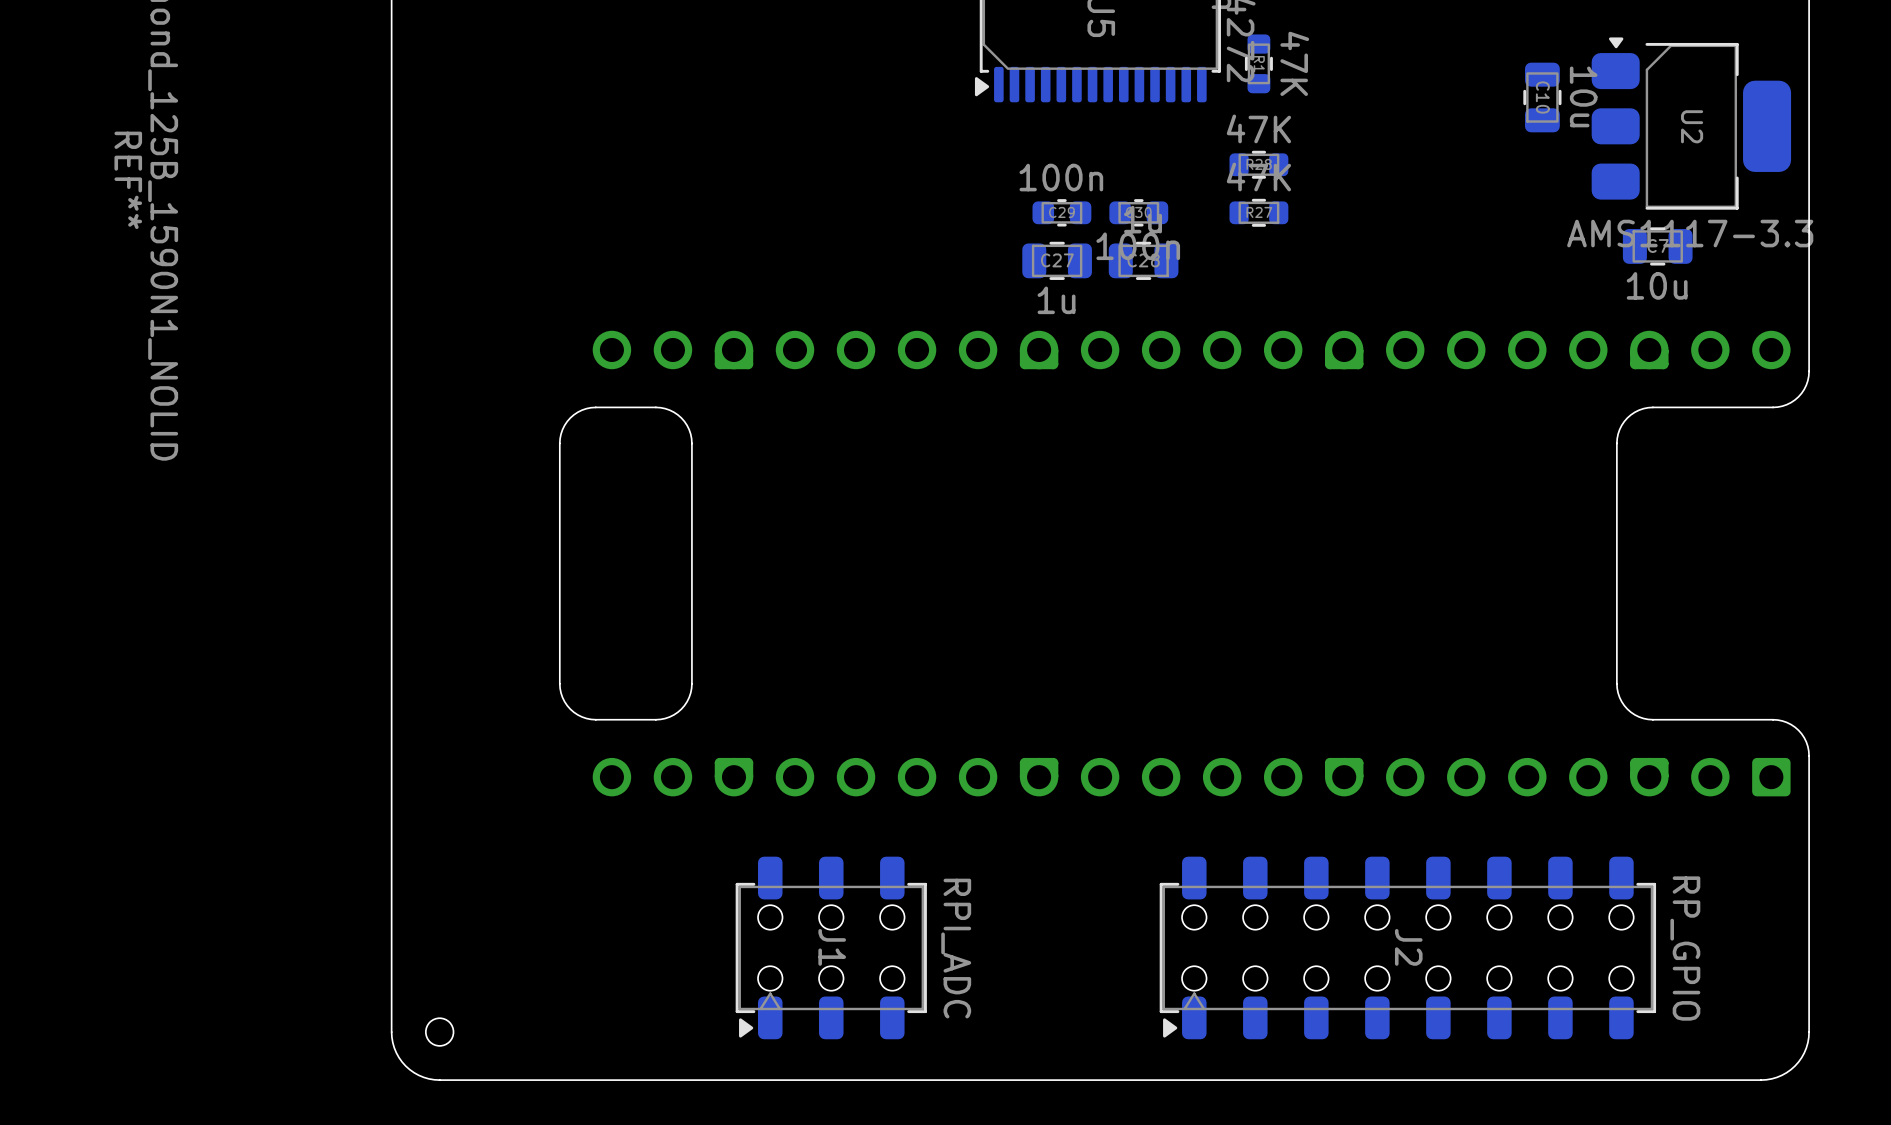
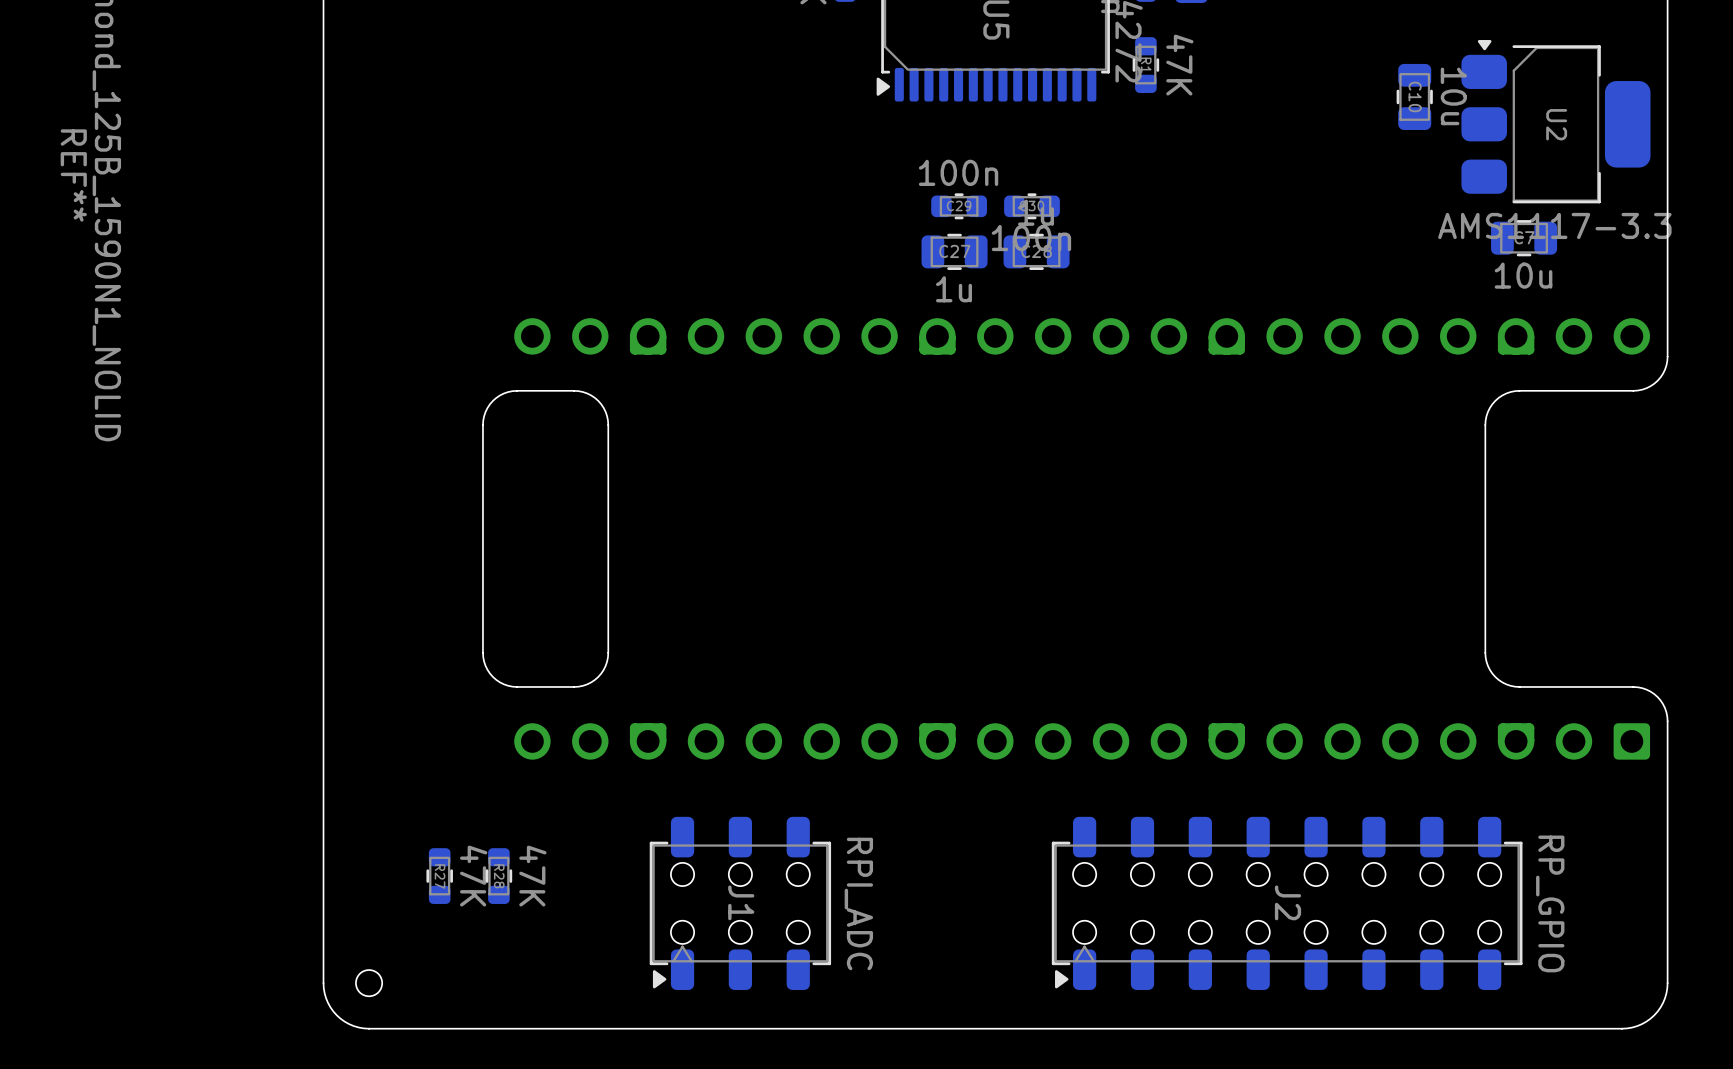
R28 rotation: 0° (1258, 164) -> 90° clockwise (498, 876)
R28 position: (1258, 164) -> (498, 876)
R27 rotation: 0° (1258, 212) -> 90° clockwise (439, 876)
R27 position: (1258, 212) -> (439, 876)

